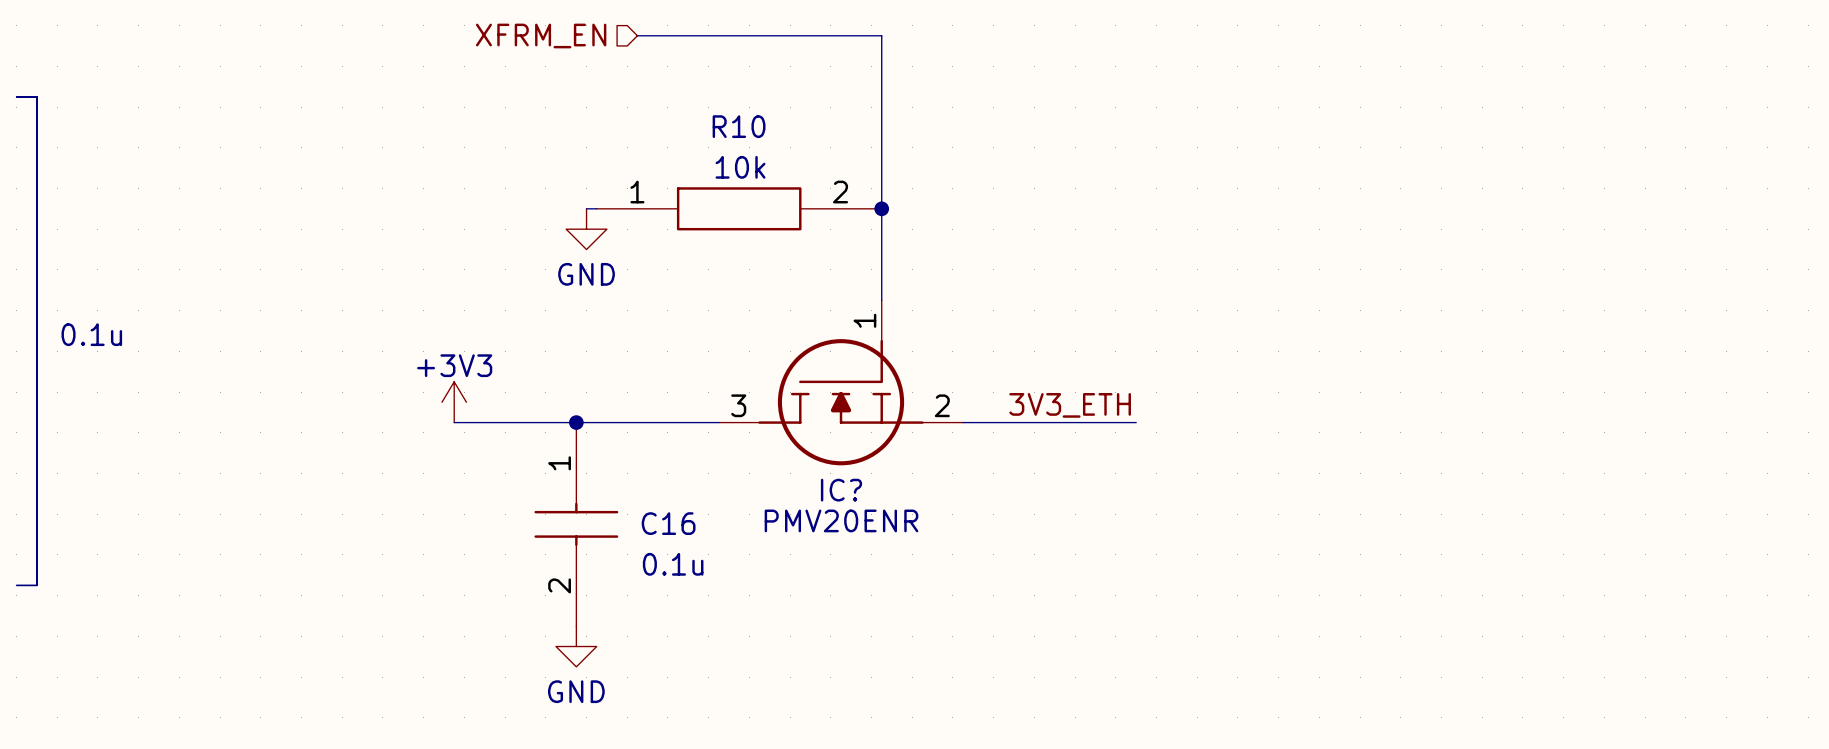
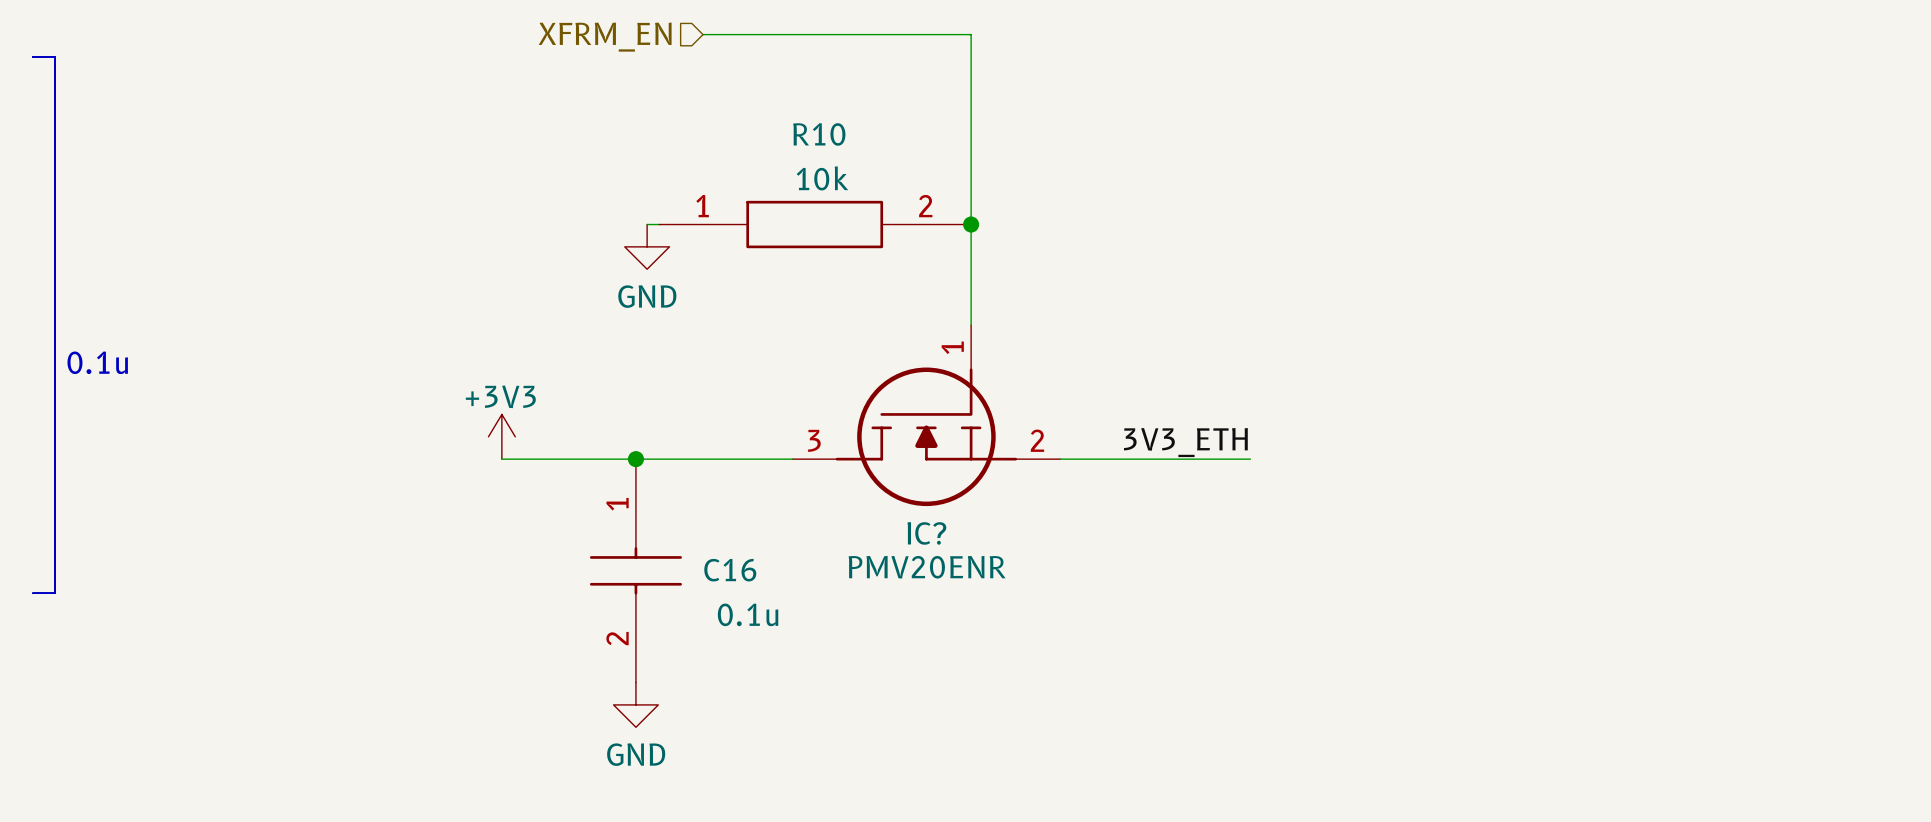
line: (16, 96) (36, 96) (36, 585) (16, 585) -> (32, 56) (54, 56) (54, 593) (32, 593)

